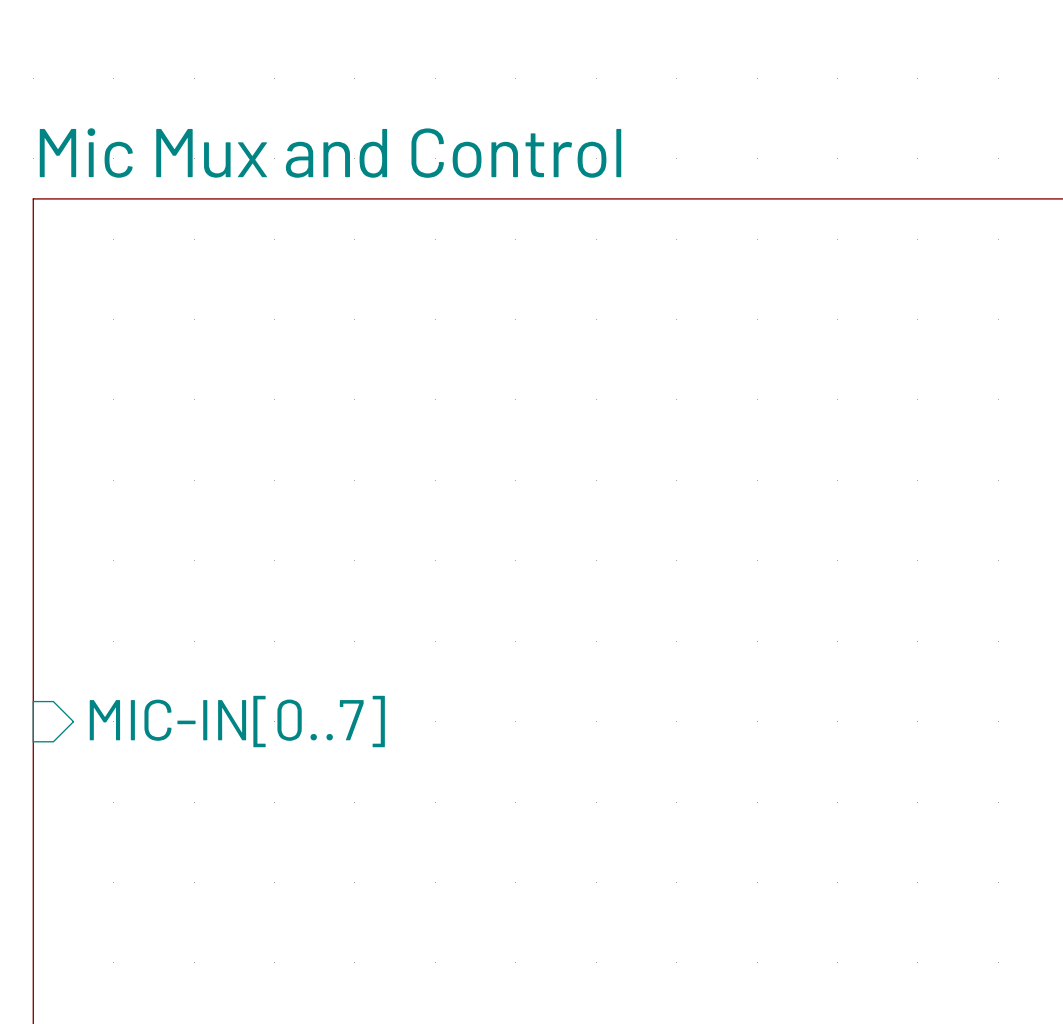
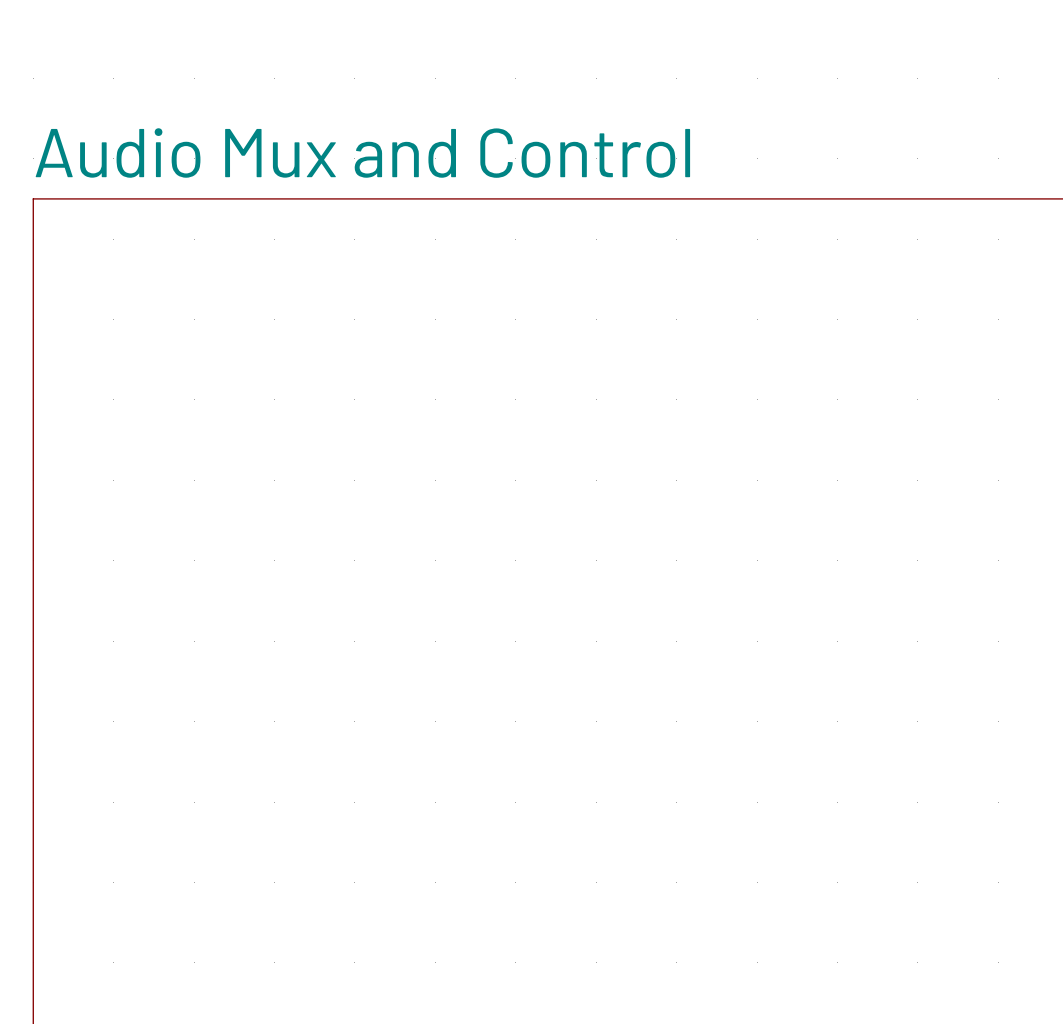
sheet Mic Mux and Control name: Mic Mux and Control (330, 153) -> Audio Mux and Control (362, 153)
sheet pin: MIC-IN[0..7] (237, 721) -> none

